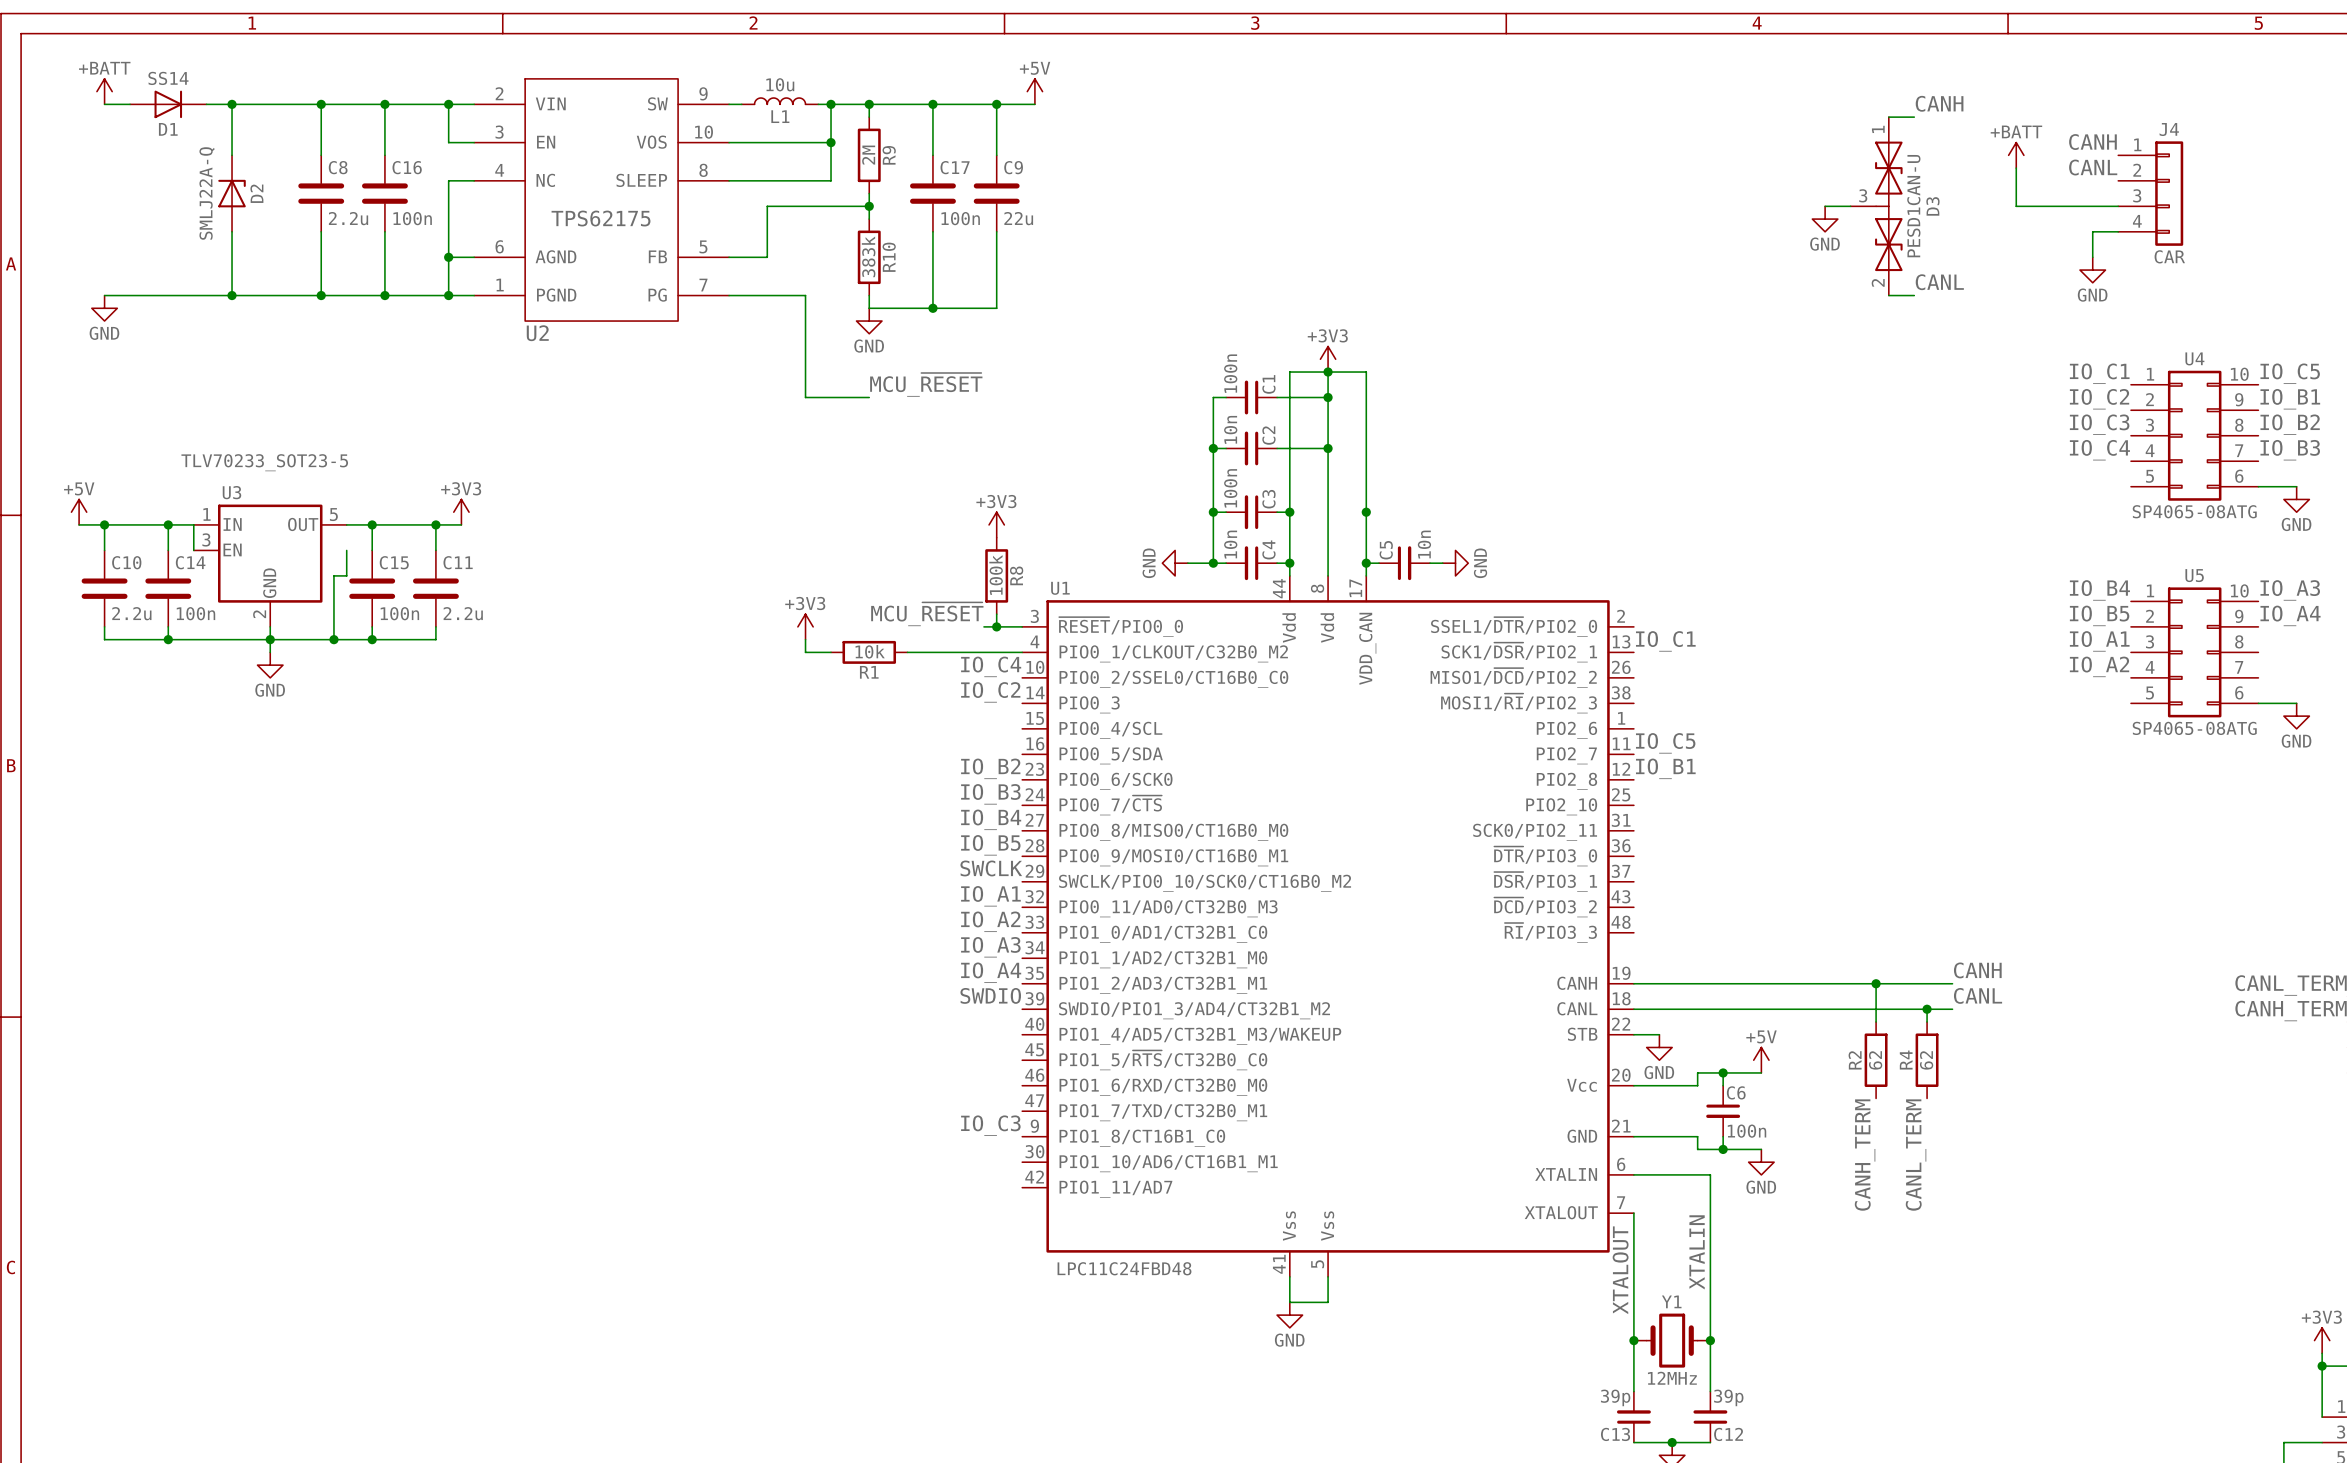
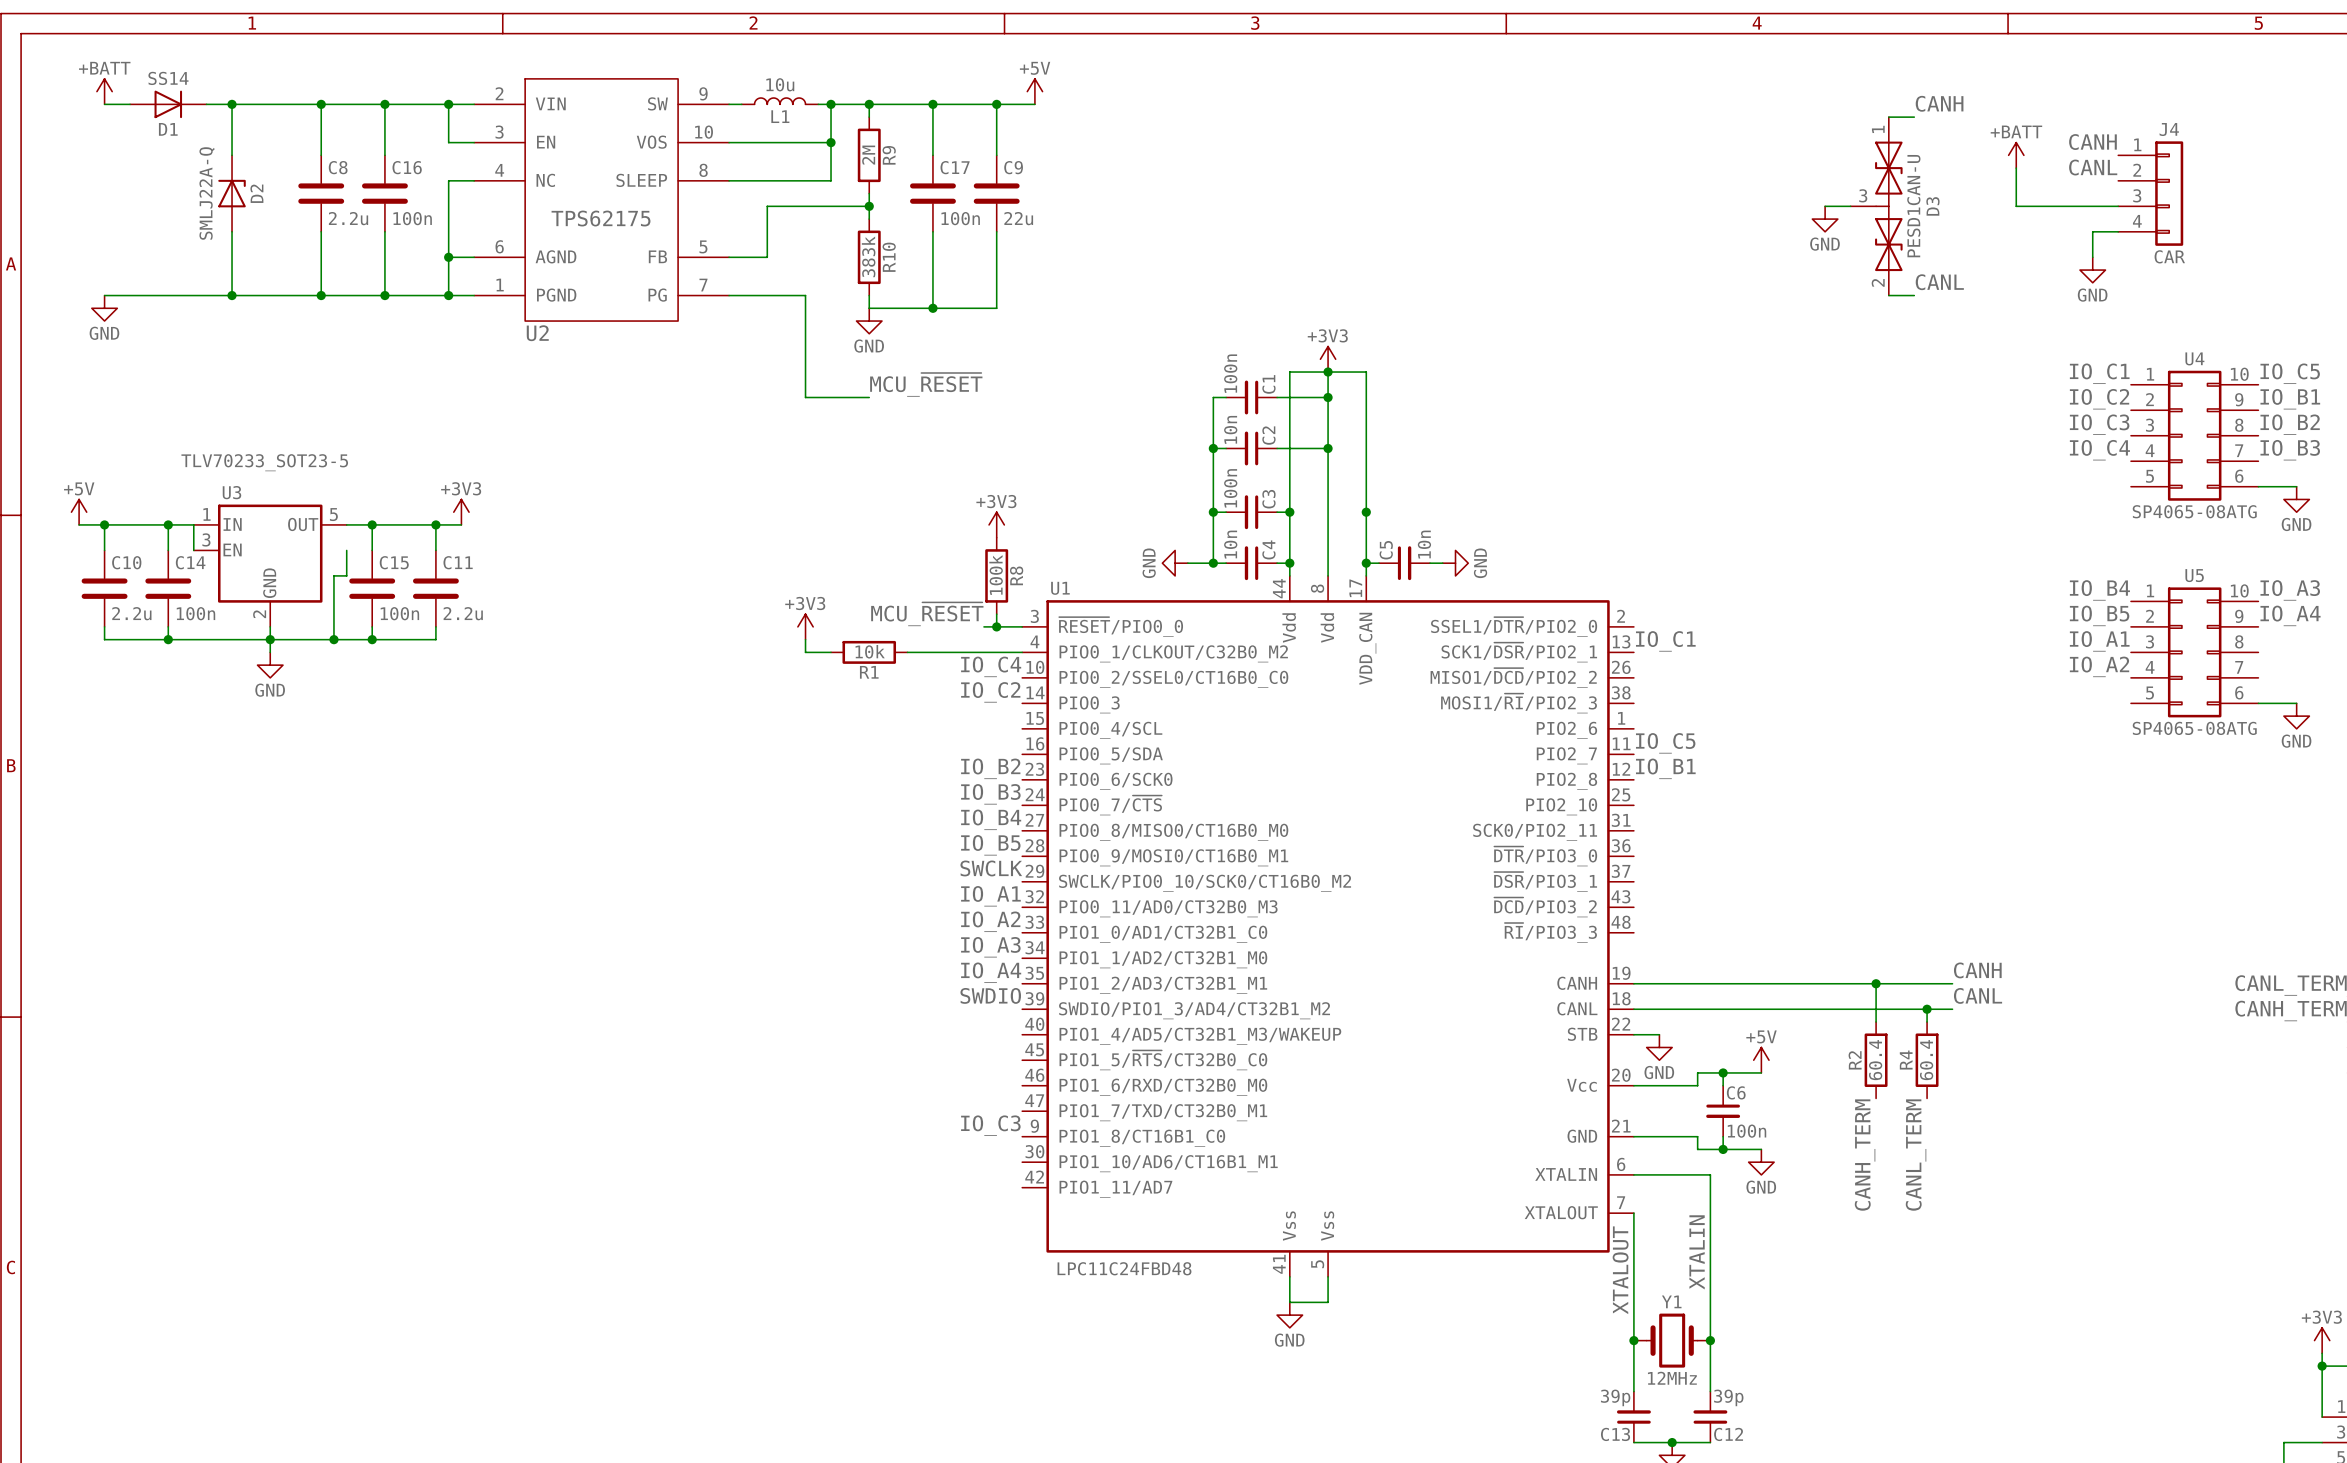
R2 value: 62 (1875, 1060) -> 60.4 (1875, 1060)
R4 value: 62 (1926, 1060) -> 60.4 (1926, 1060)

